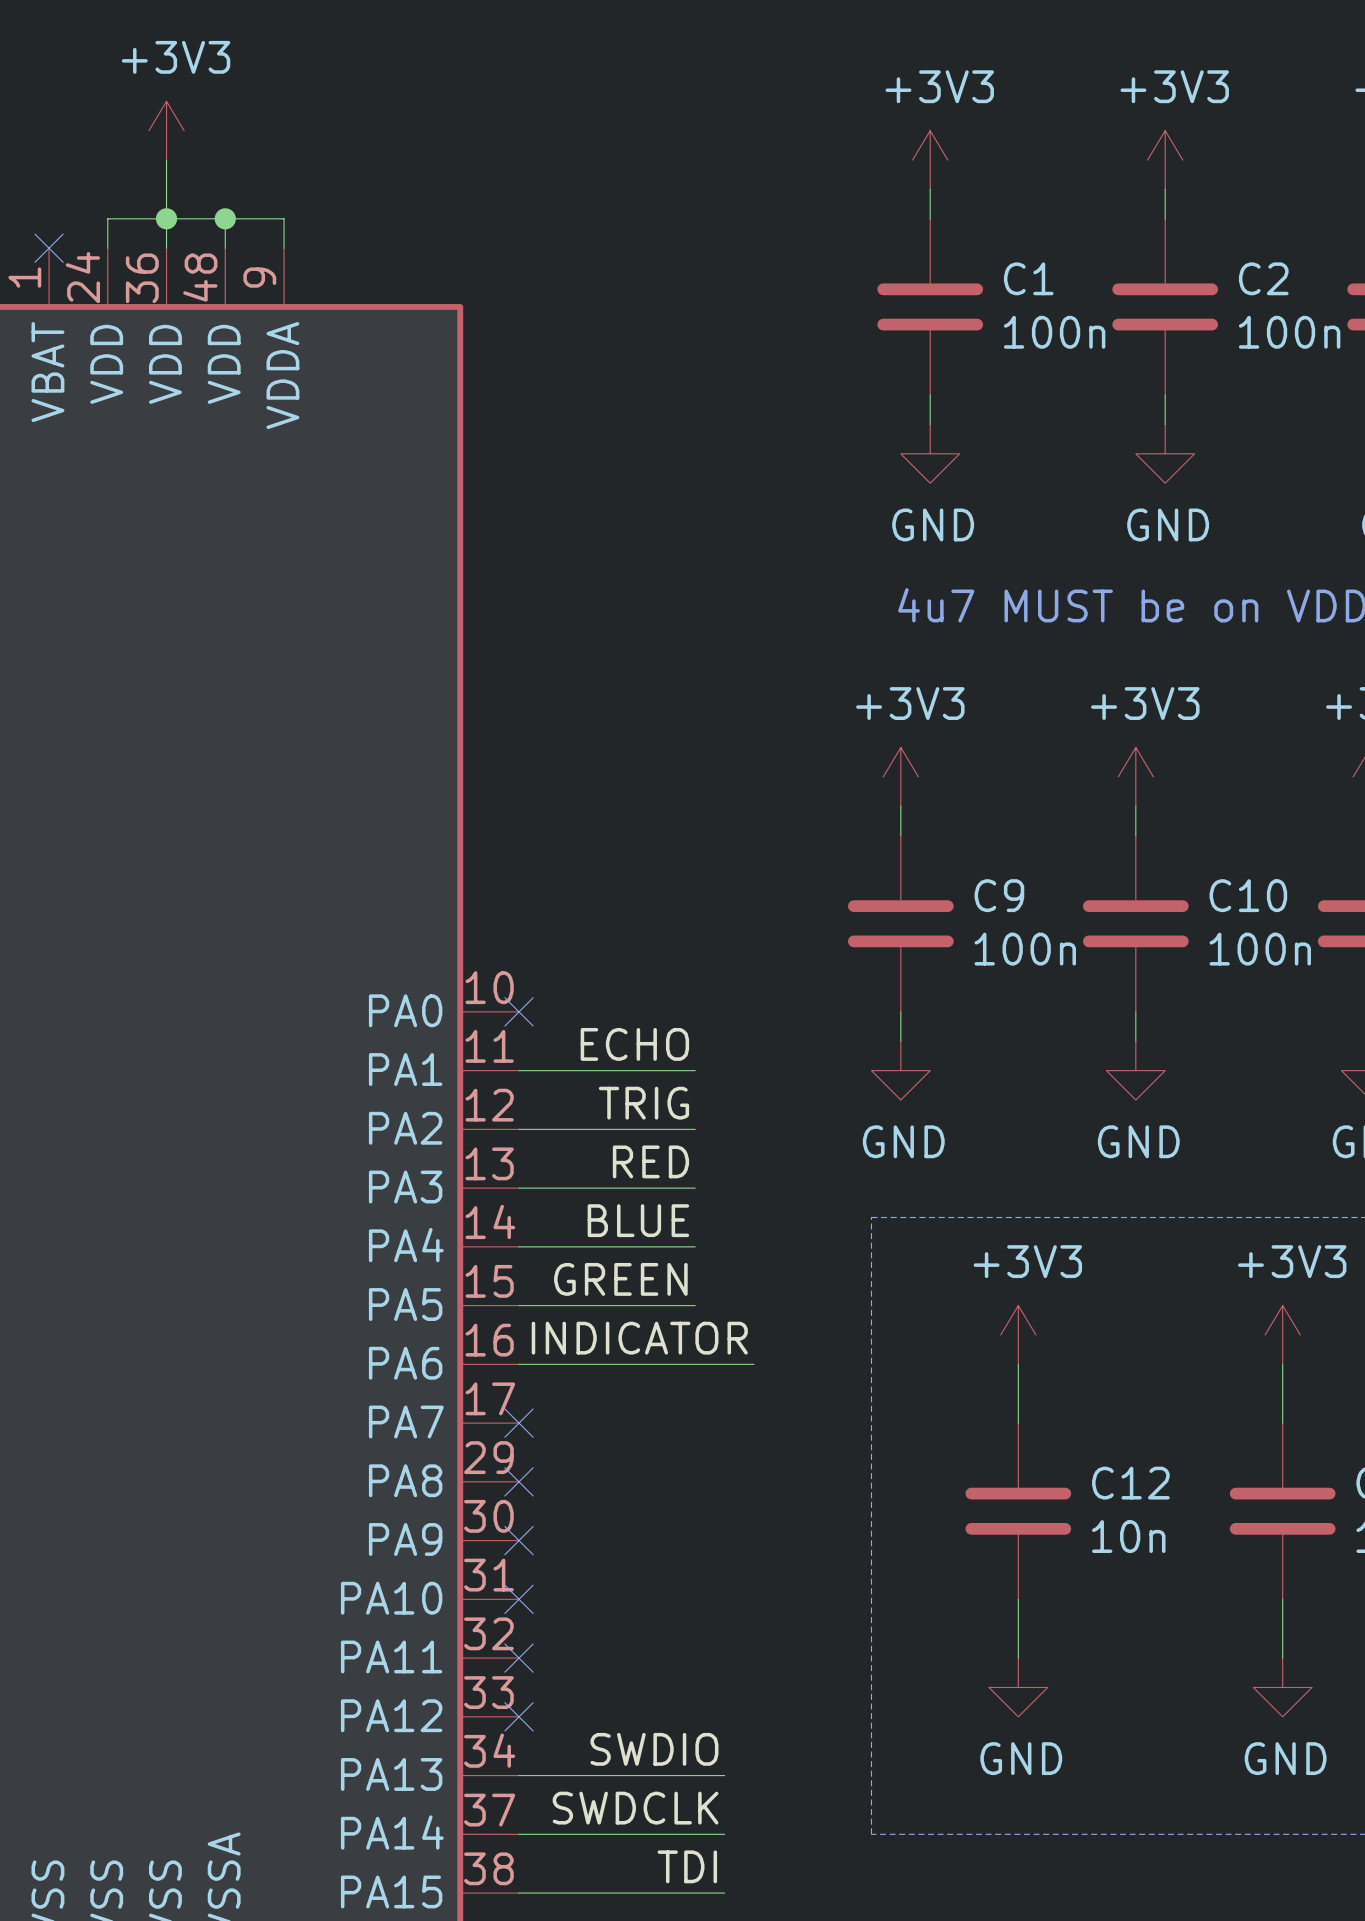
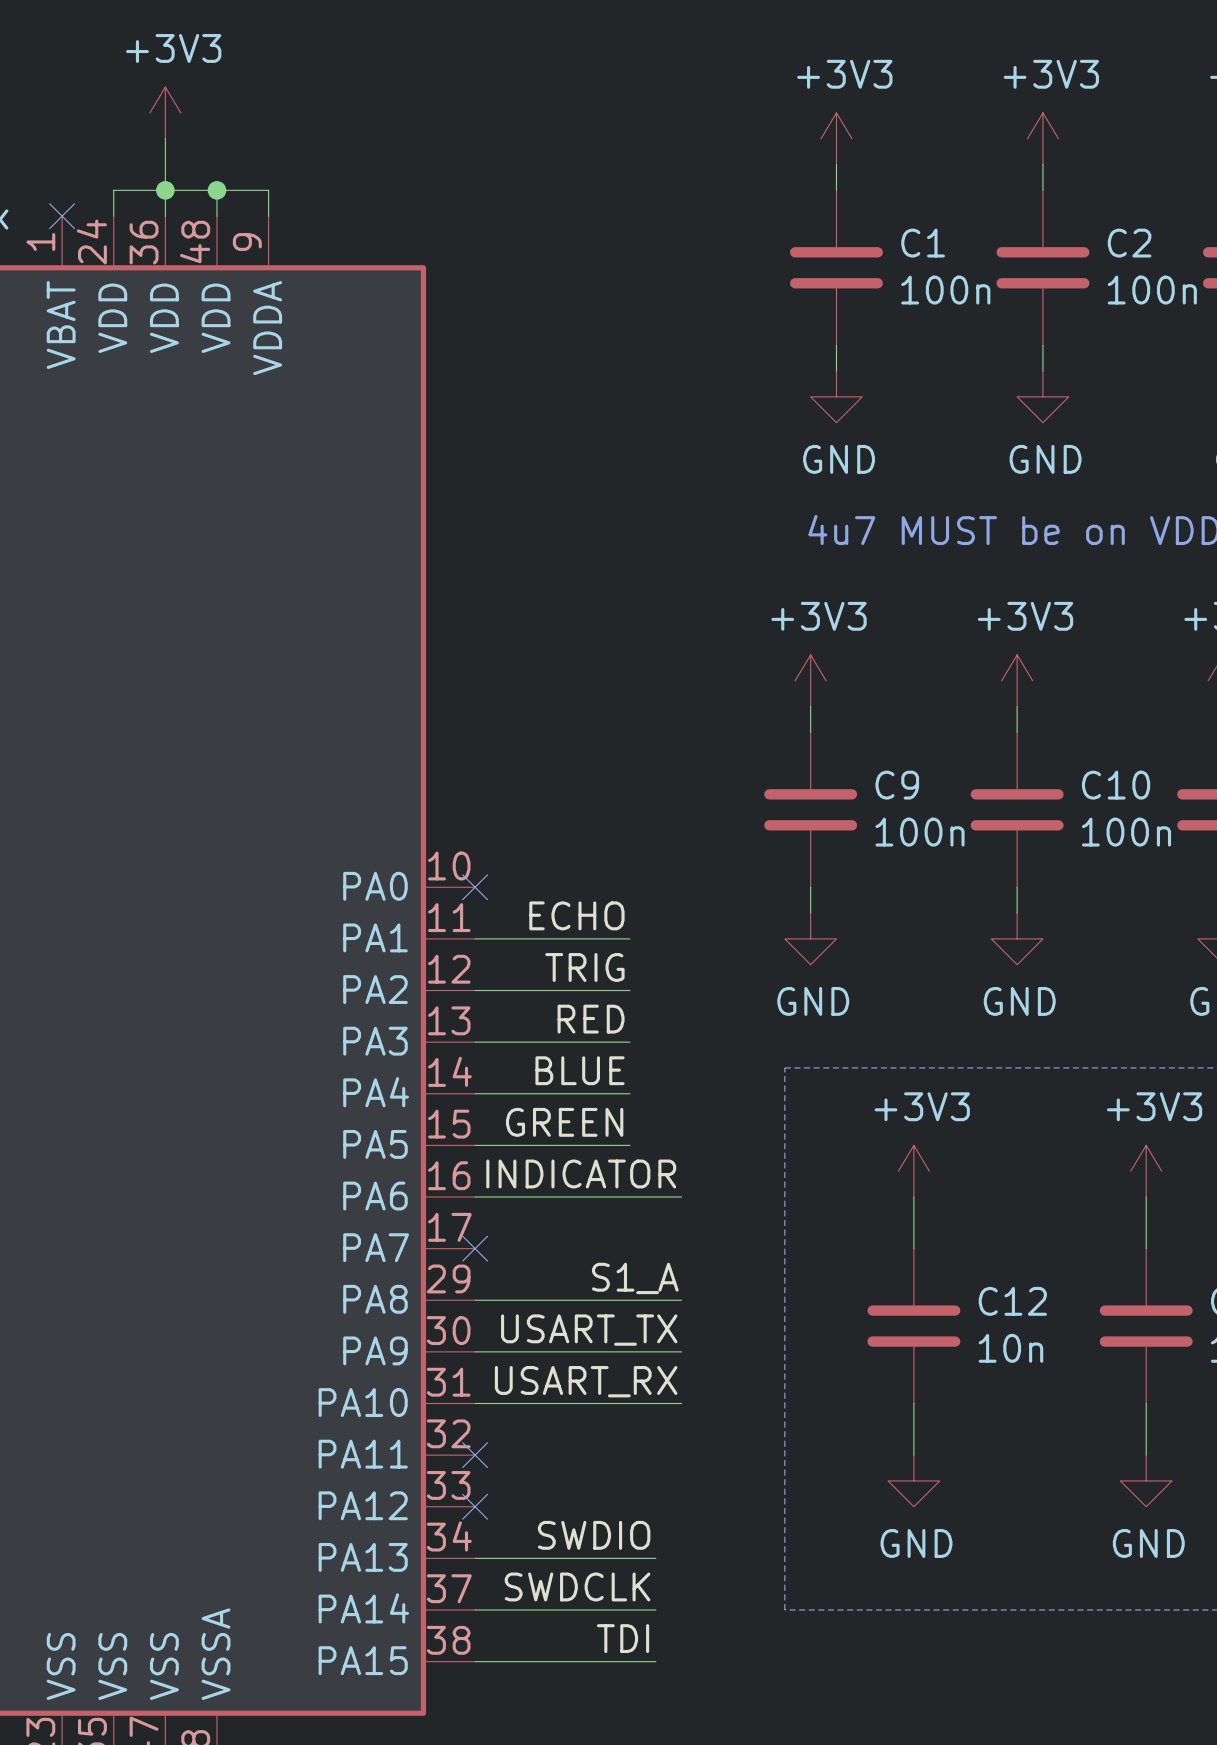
label: none -> S1_A (635, 1278)
wire: none -> (475, 1300) (681, 1300)
no-connect mark: (519, 1481) -> none
label: none -> USART_TX (589, 1330)
wire: none -> (475, 1351) (681, 1351)
no-connect mark: (519, 1540) -> none
label: none -> USART_RX (586, 1381)
wire: none -> (475, 1403) (681, 1403)
no-connect mark: (519, 1599) -> none

